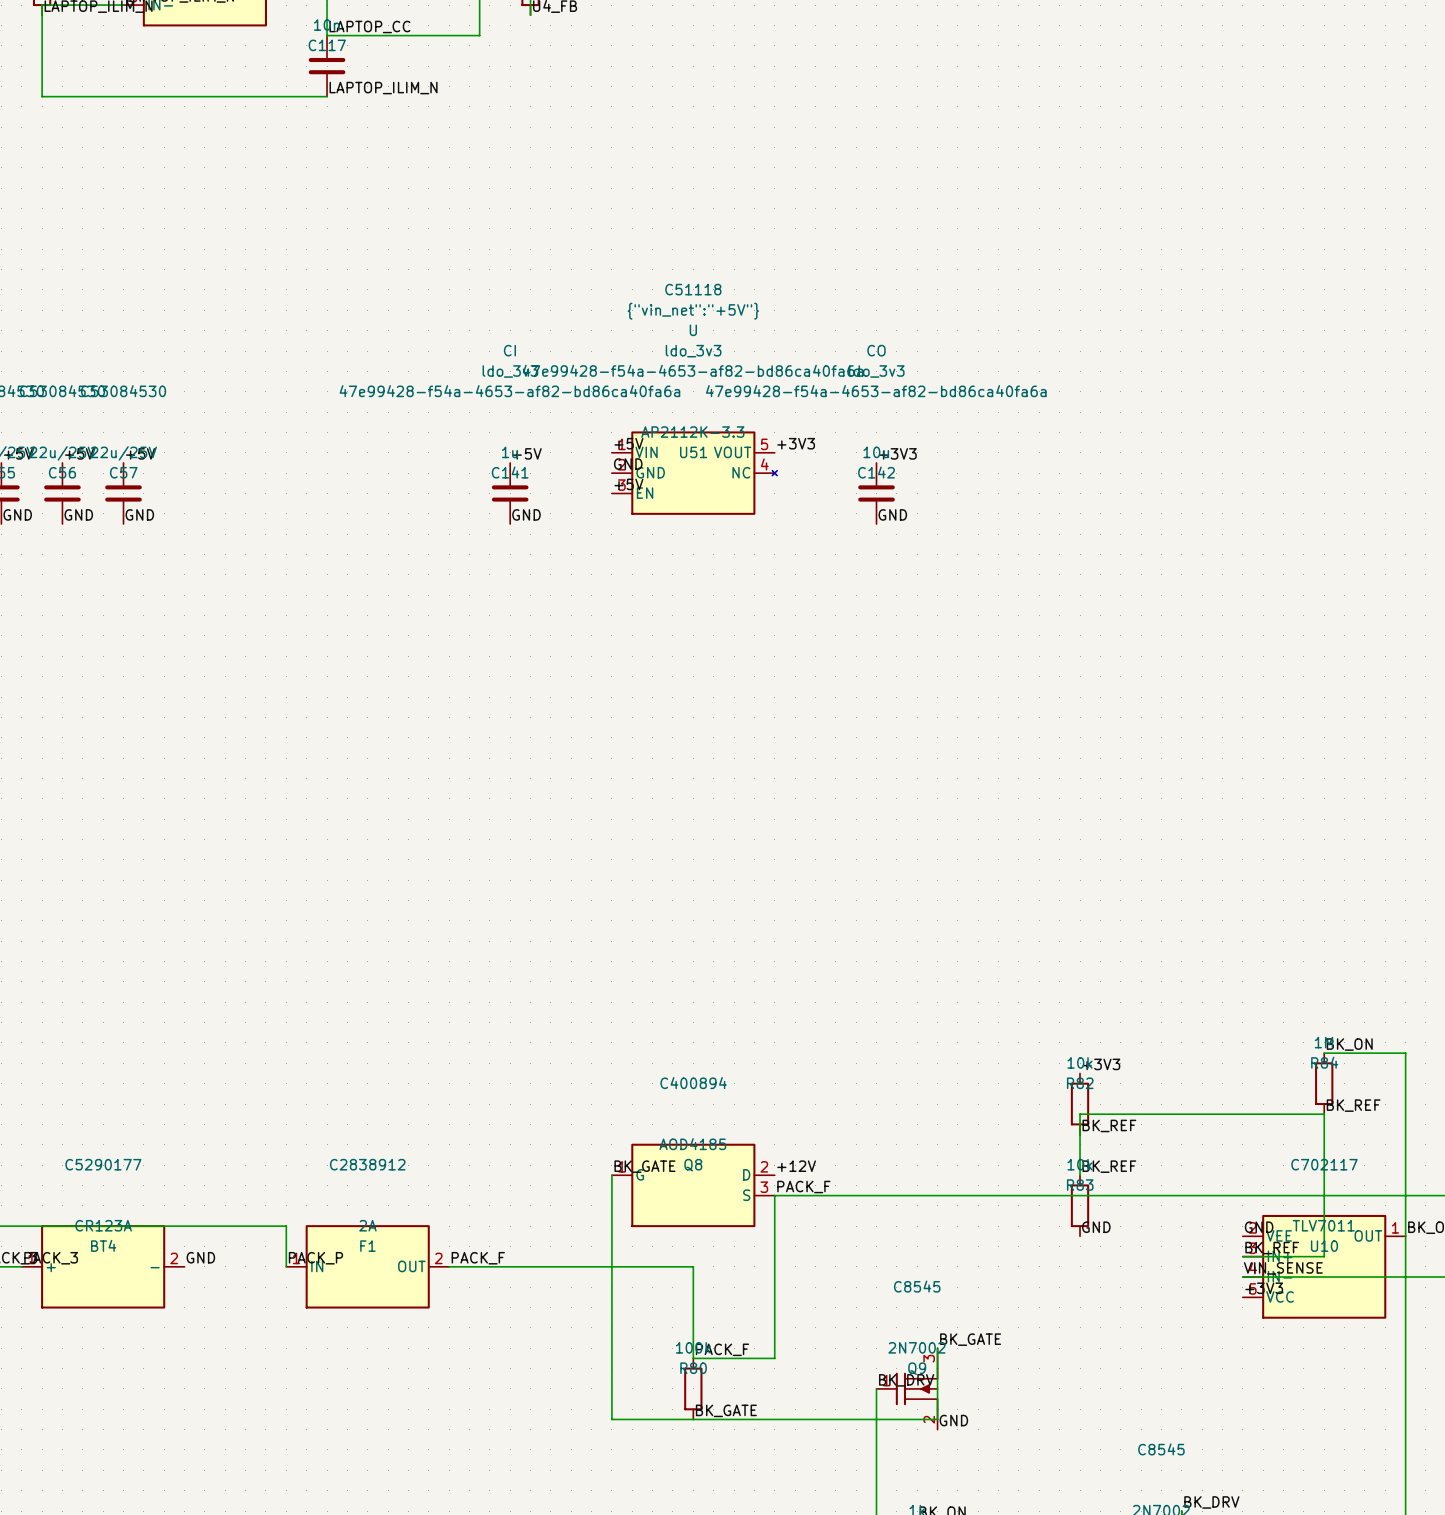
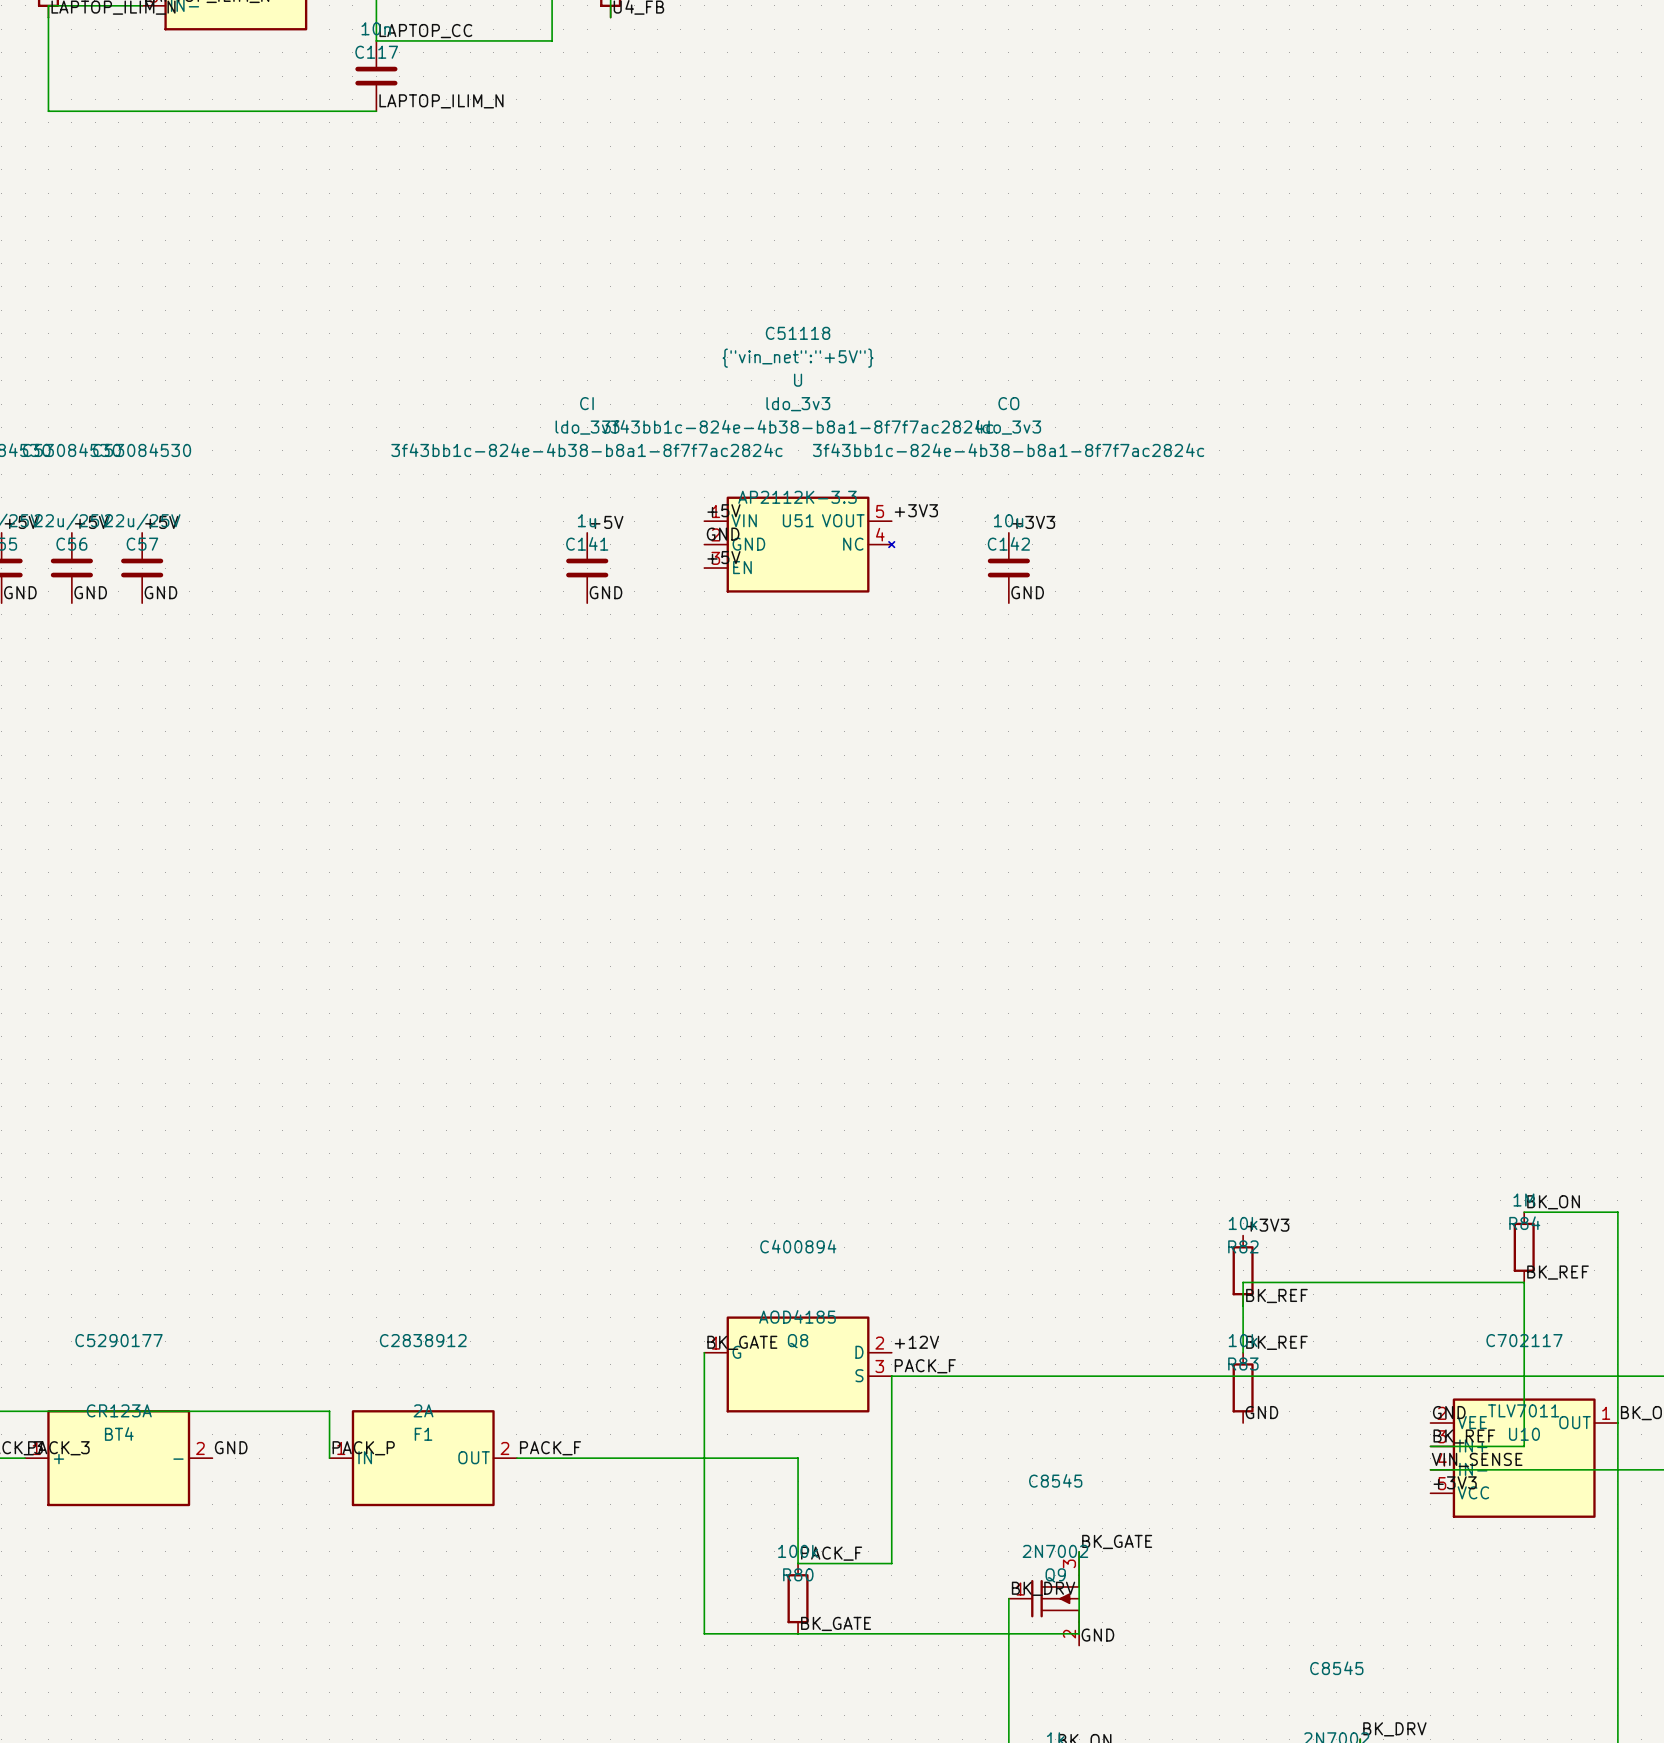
U51 text: 47e99428-f54a-4653-af82-bd86ca40fa6a (693, 370) -> 3f43bb1c-824e-4b38-b8a1-8f7f7ac2824c (797, 426)
C141 text: 47e99428-f54a-4653-af82-bd86ca40fa6a (509, 391) -> 3f43bb1c-824e-4b38-b8a1-8f7f7ac2824c (586, 450)
C142 text: 47e99428-f54a-4653-af82-bd86ca40fa6a (876, 391) -> 3f43bb1c-824e-4b38-b8a1-8f7f7ac2824c (1008, 450)

